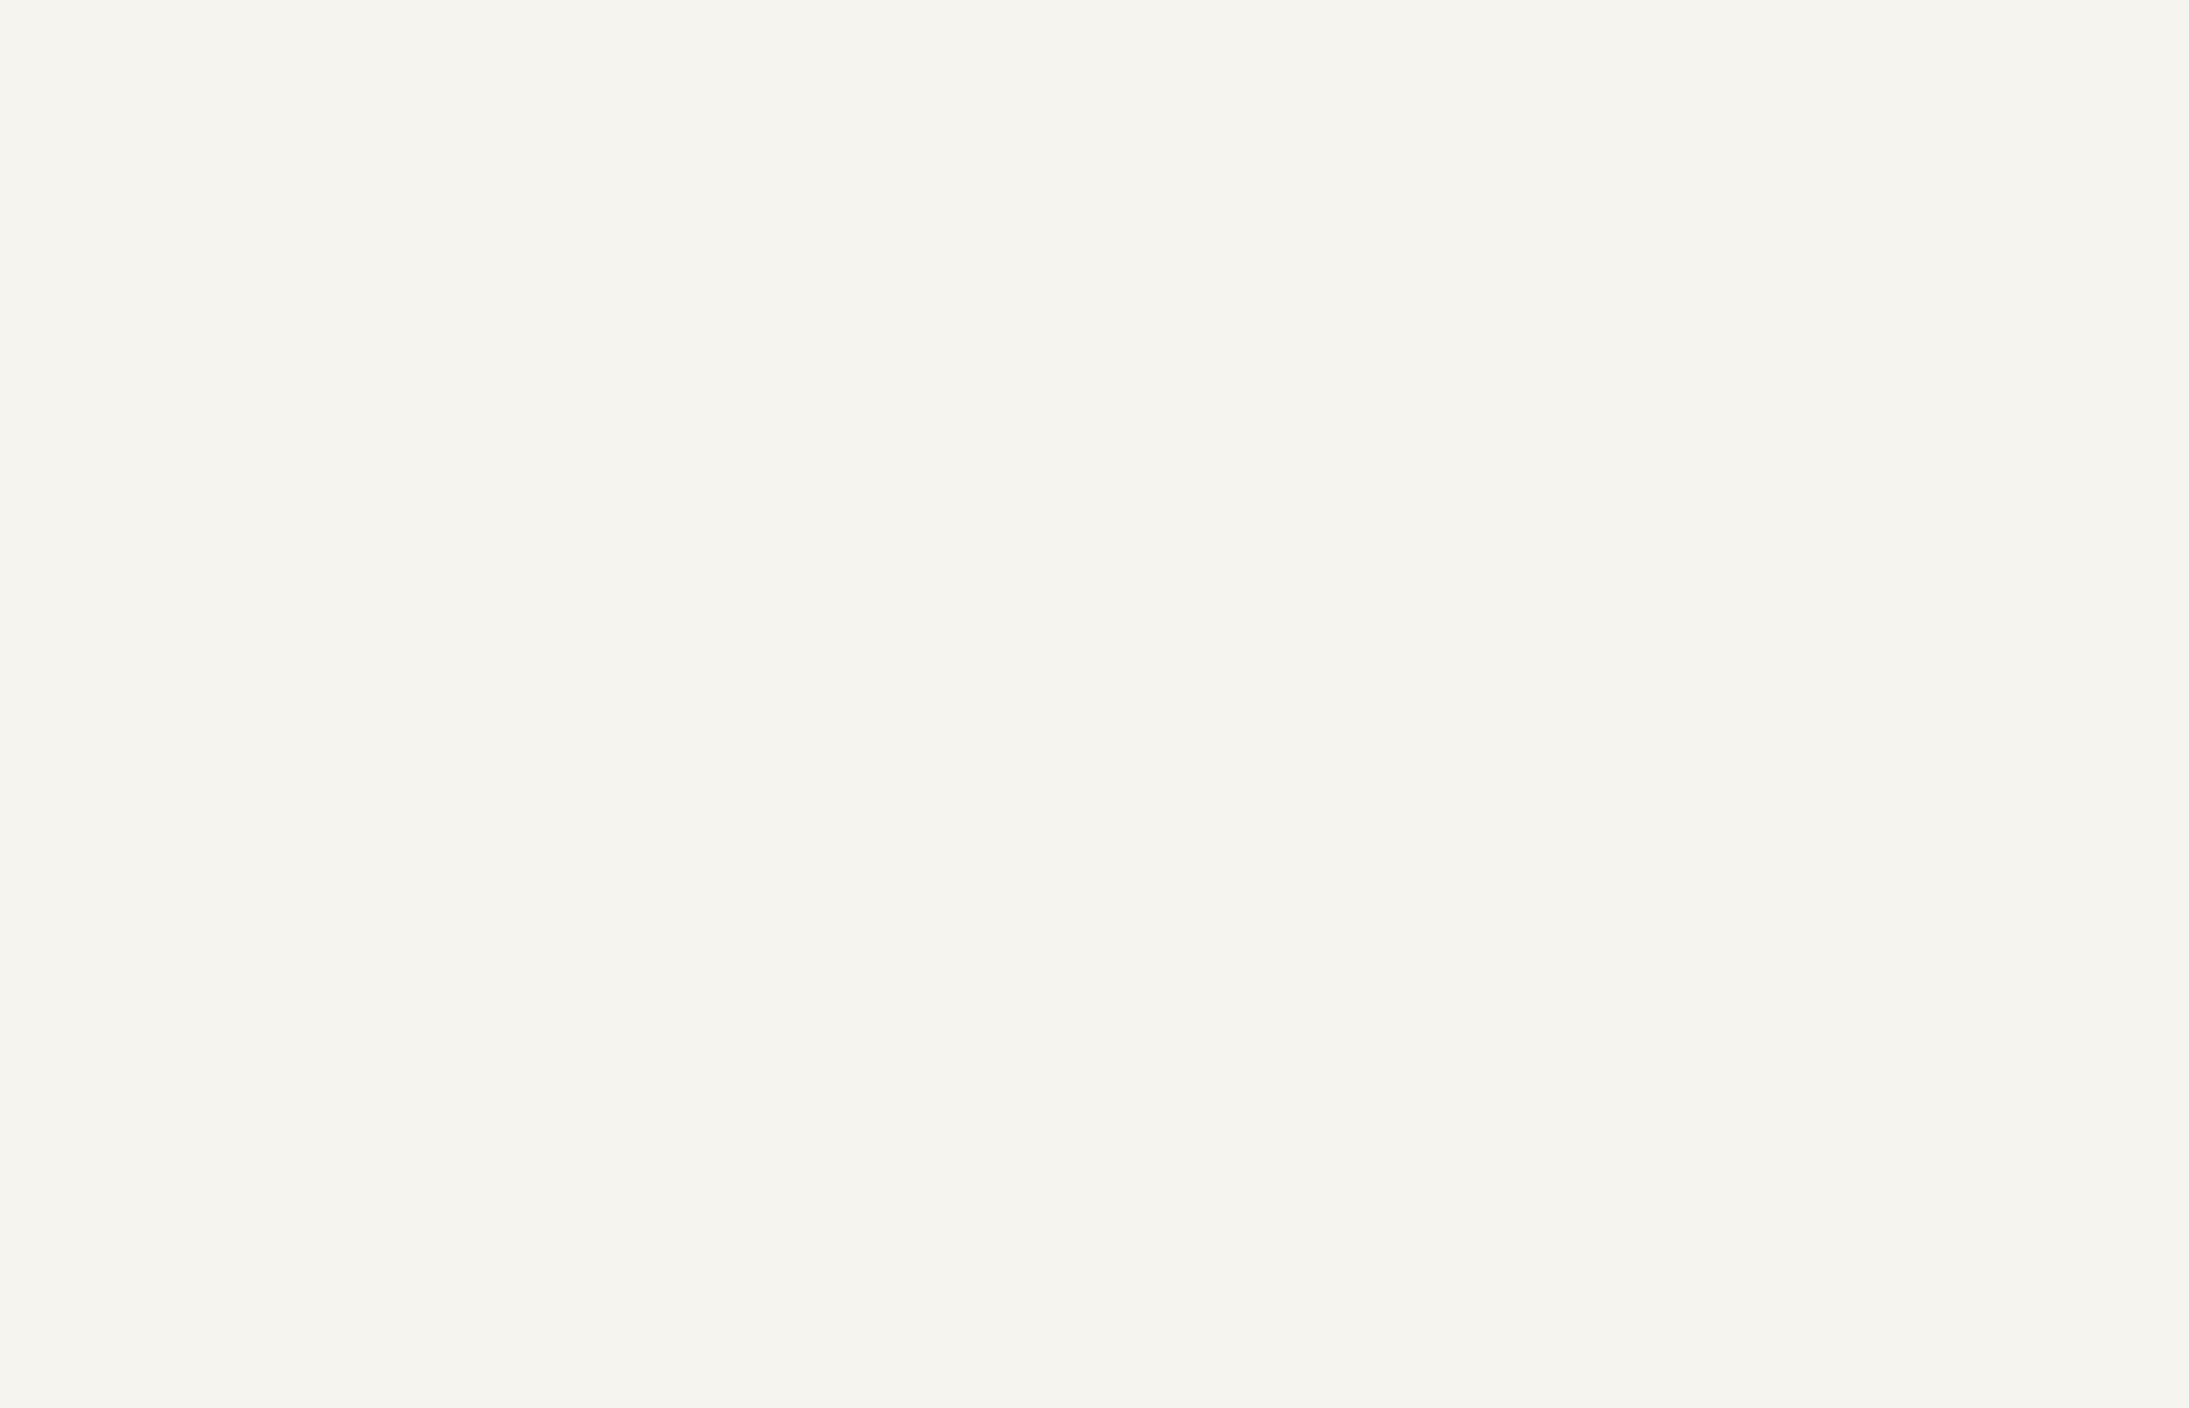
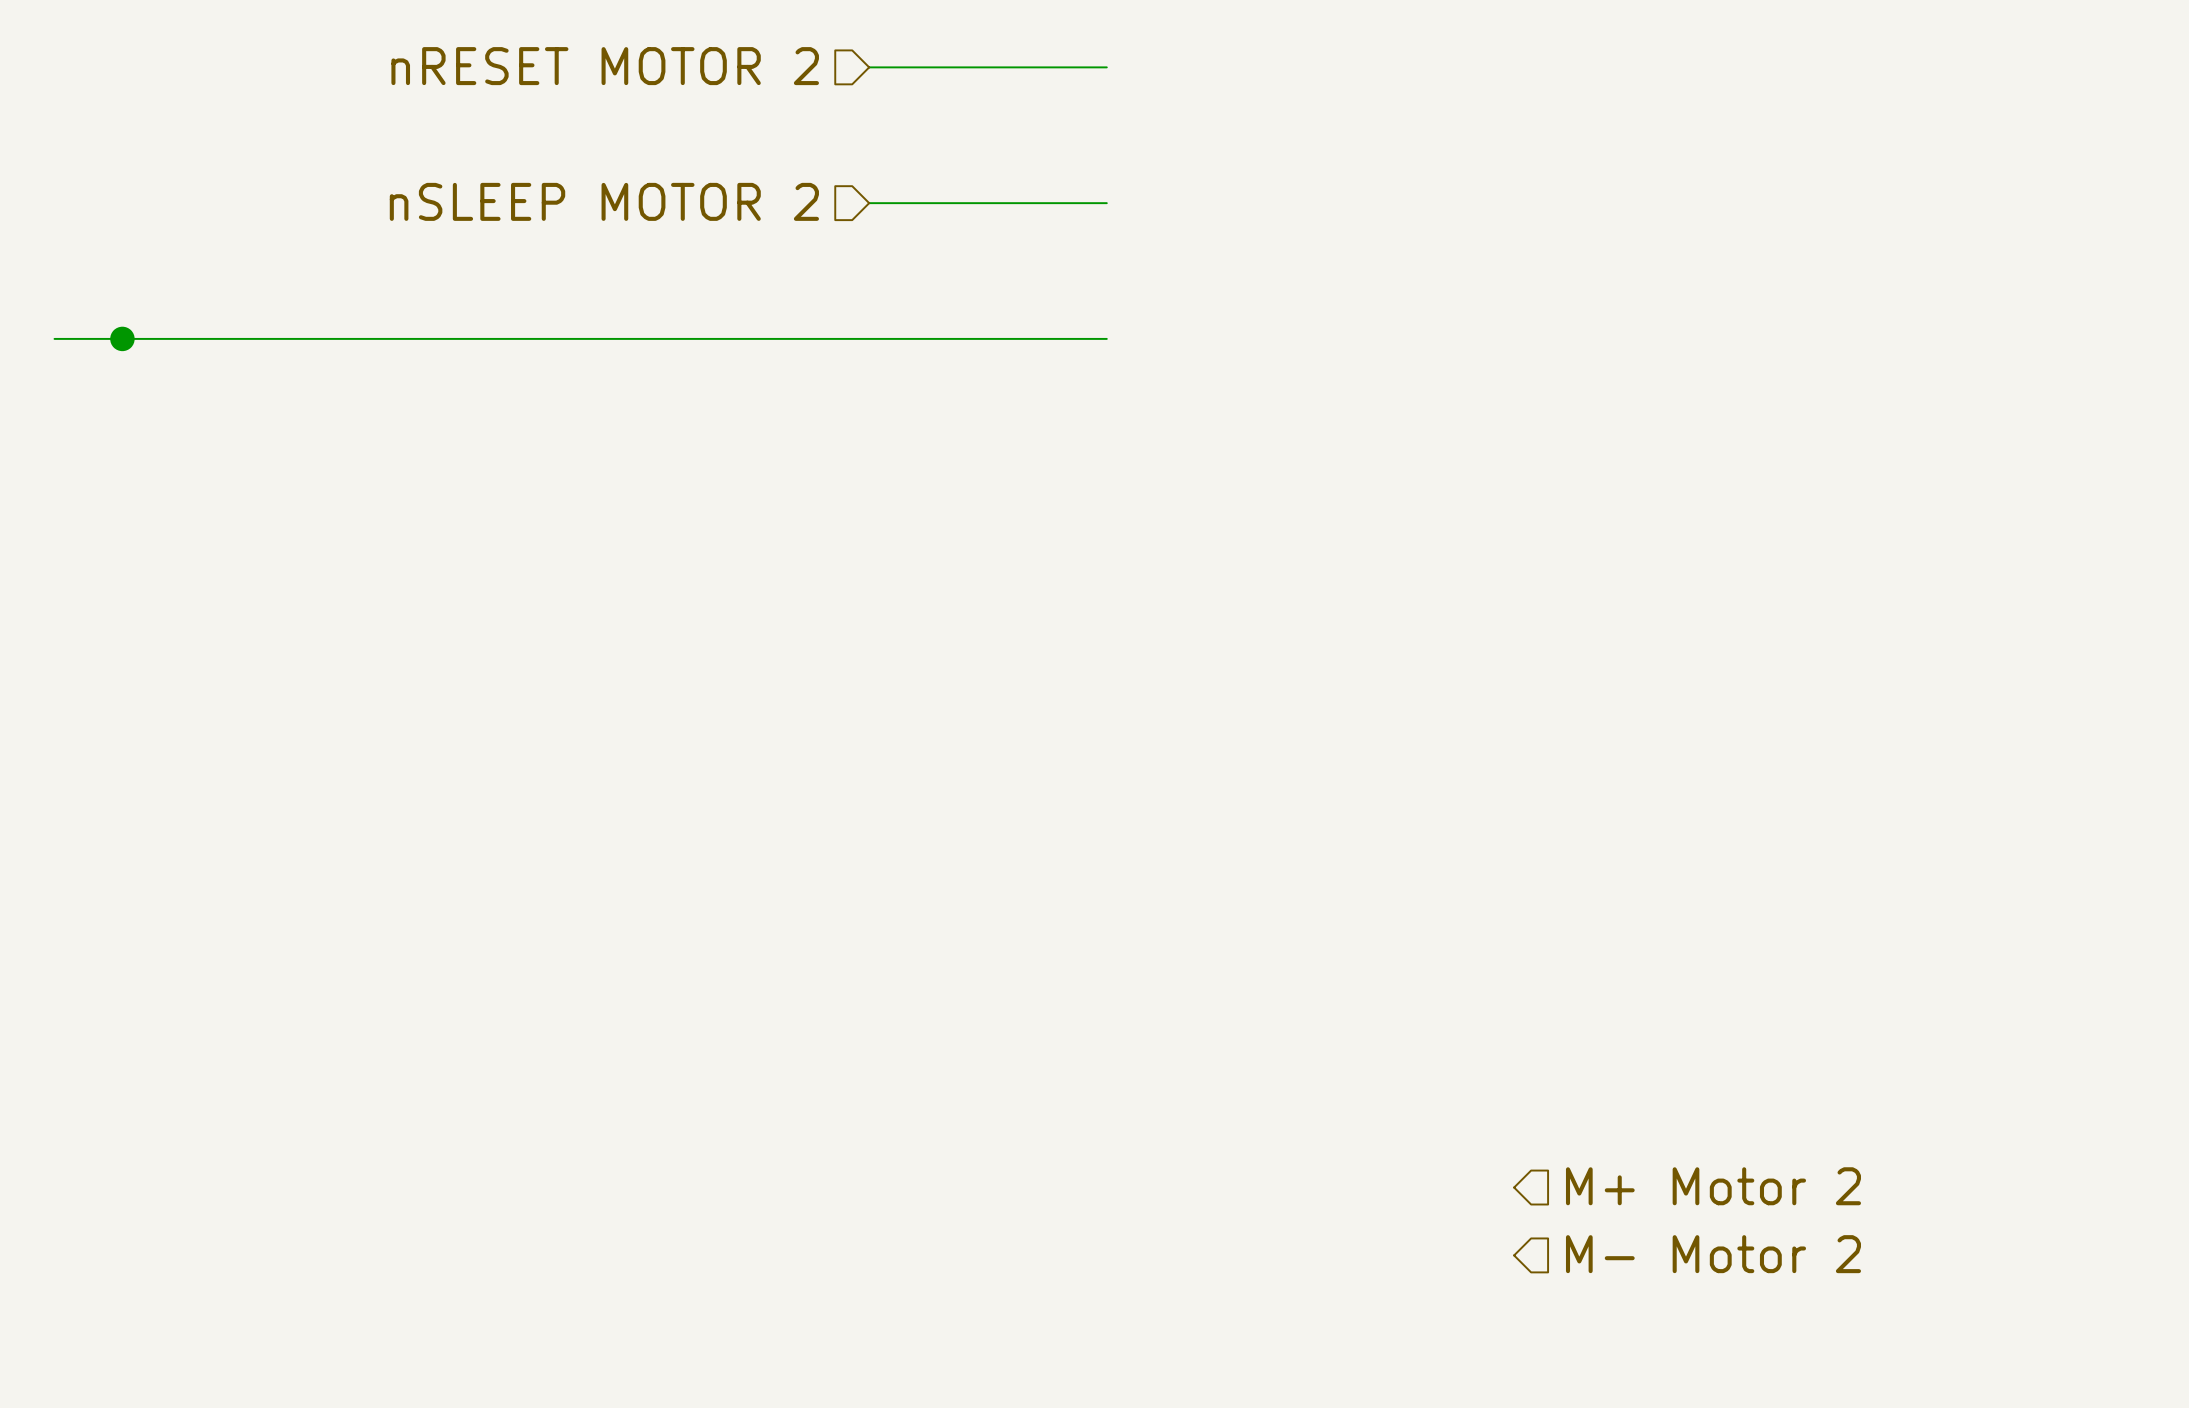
hierarchical label: none -> nRESET MOTOR 2 (605, 66)
wire: none -> (869, 67) (1106, 67)
hierarchical label: none -> nSLEEP MOTOR 2 (604, 201)
wire: none -> (869, 203) (1106, 203)
wire: none -> (54, 338) (1106, 338)
junction: none -> (122, 338)
hierarchical label: none -> M+ Motor 2 (1713, 1186)
hierarchical label: none -> M- Motor 2 (1713, 1254)

